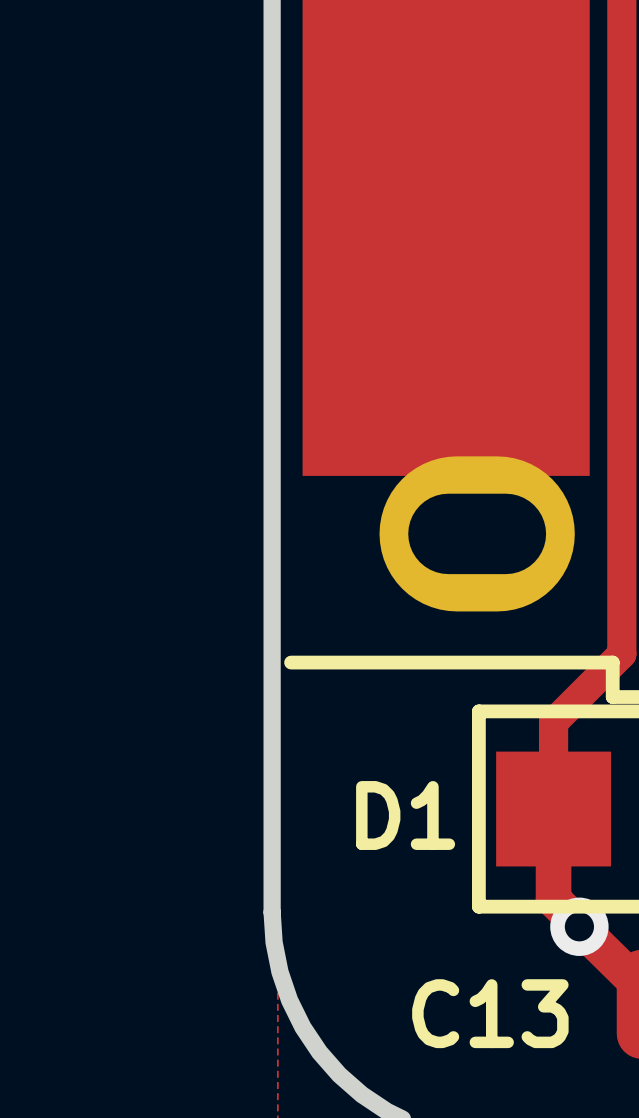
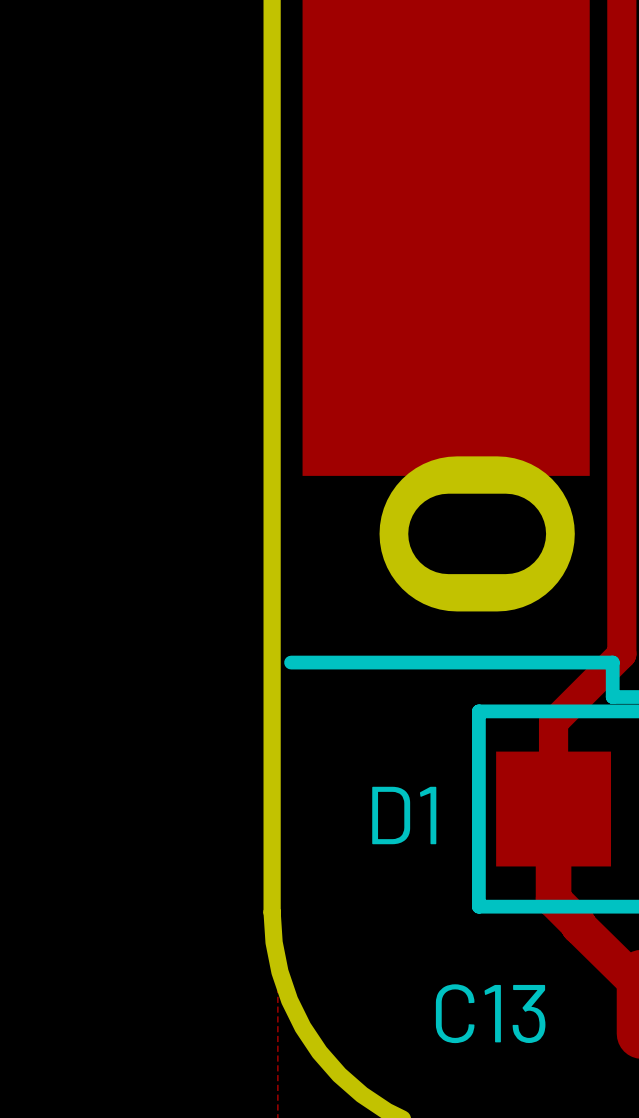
via: (579, 926) -> none

